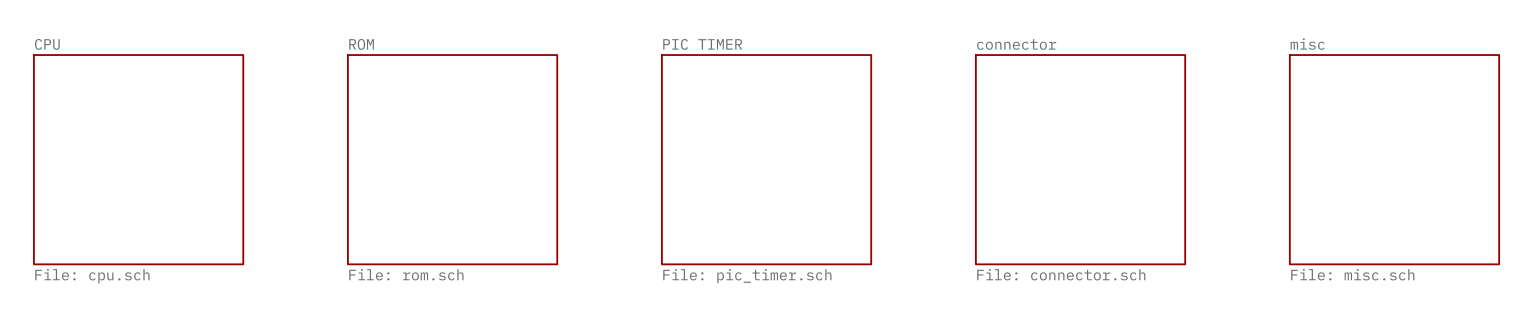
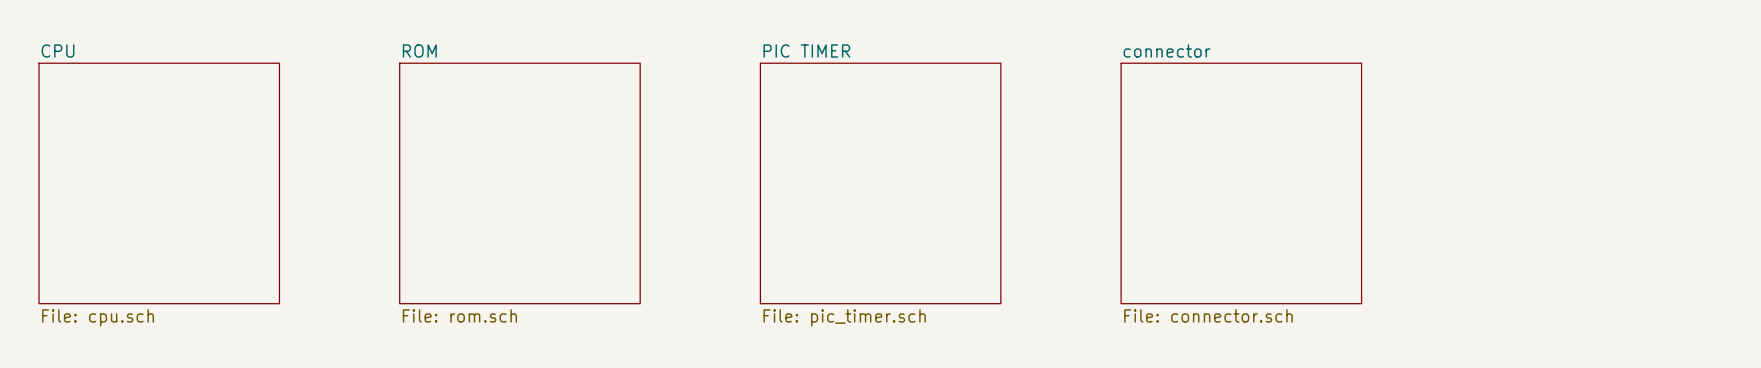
sheet misc: File: misc.sch (1394, 159) -> none

